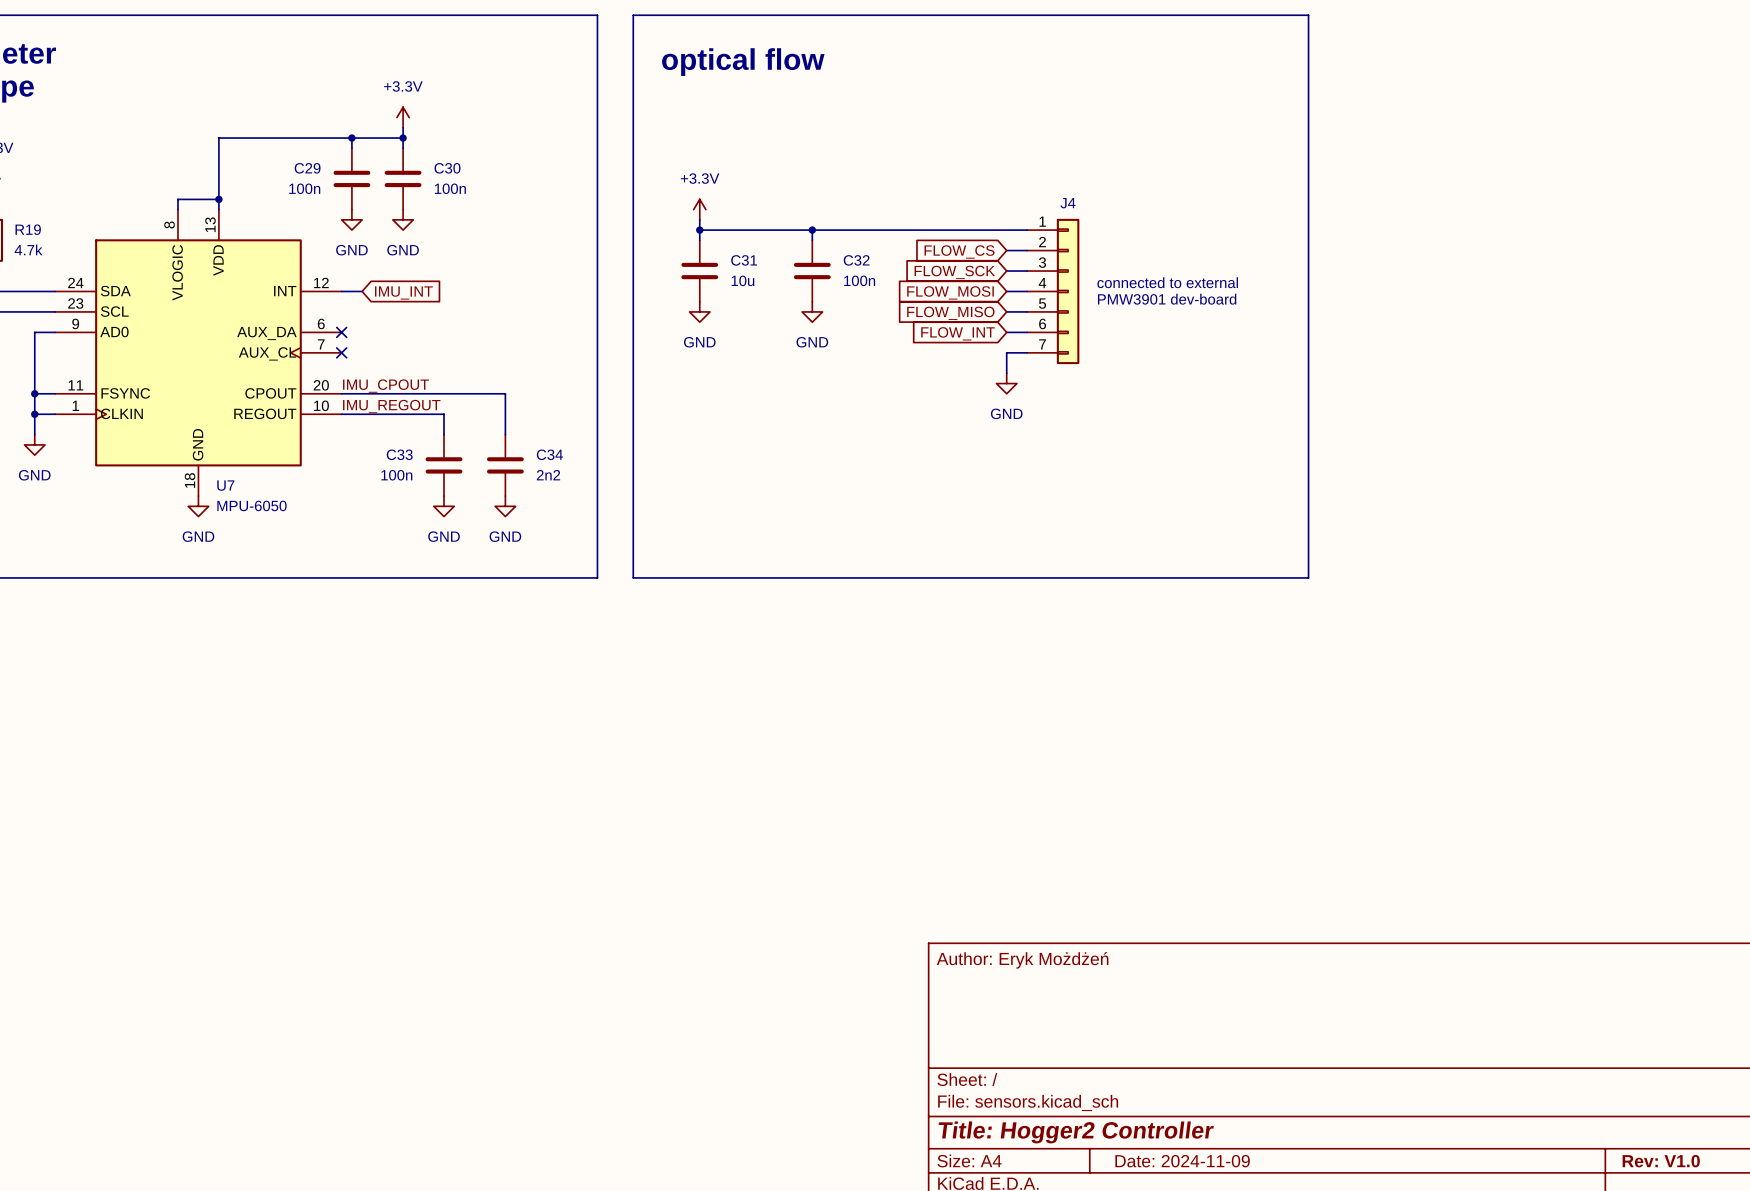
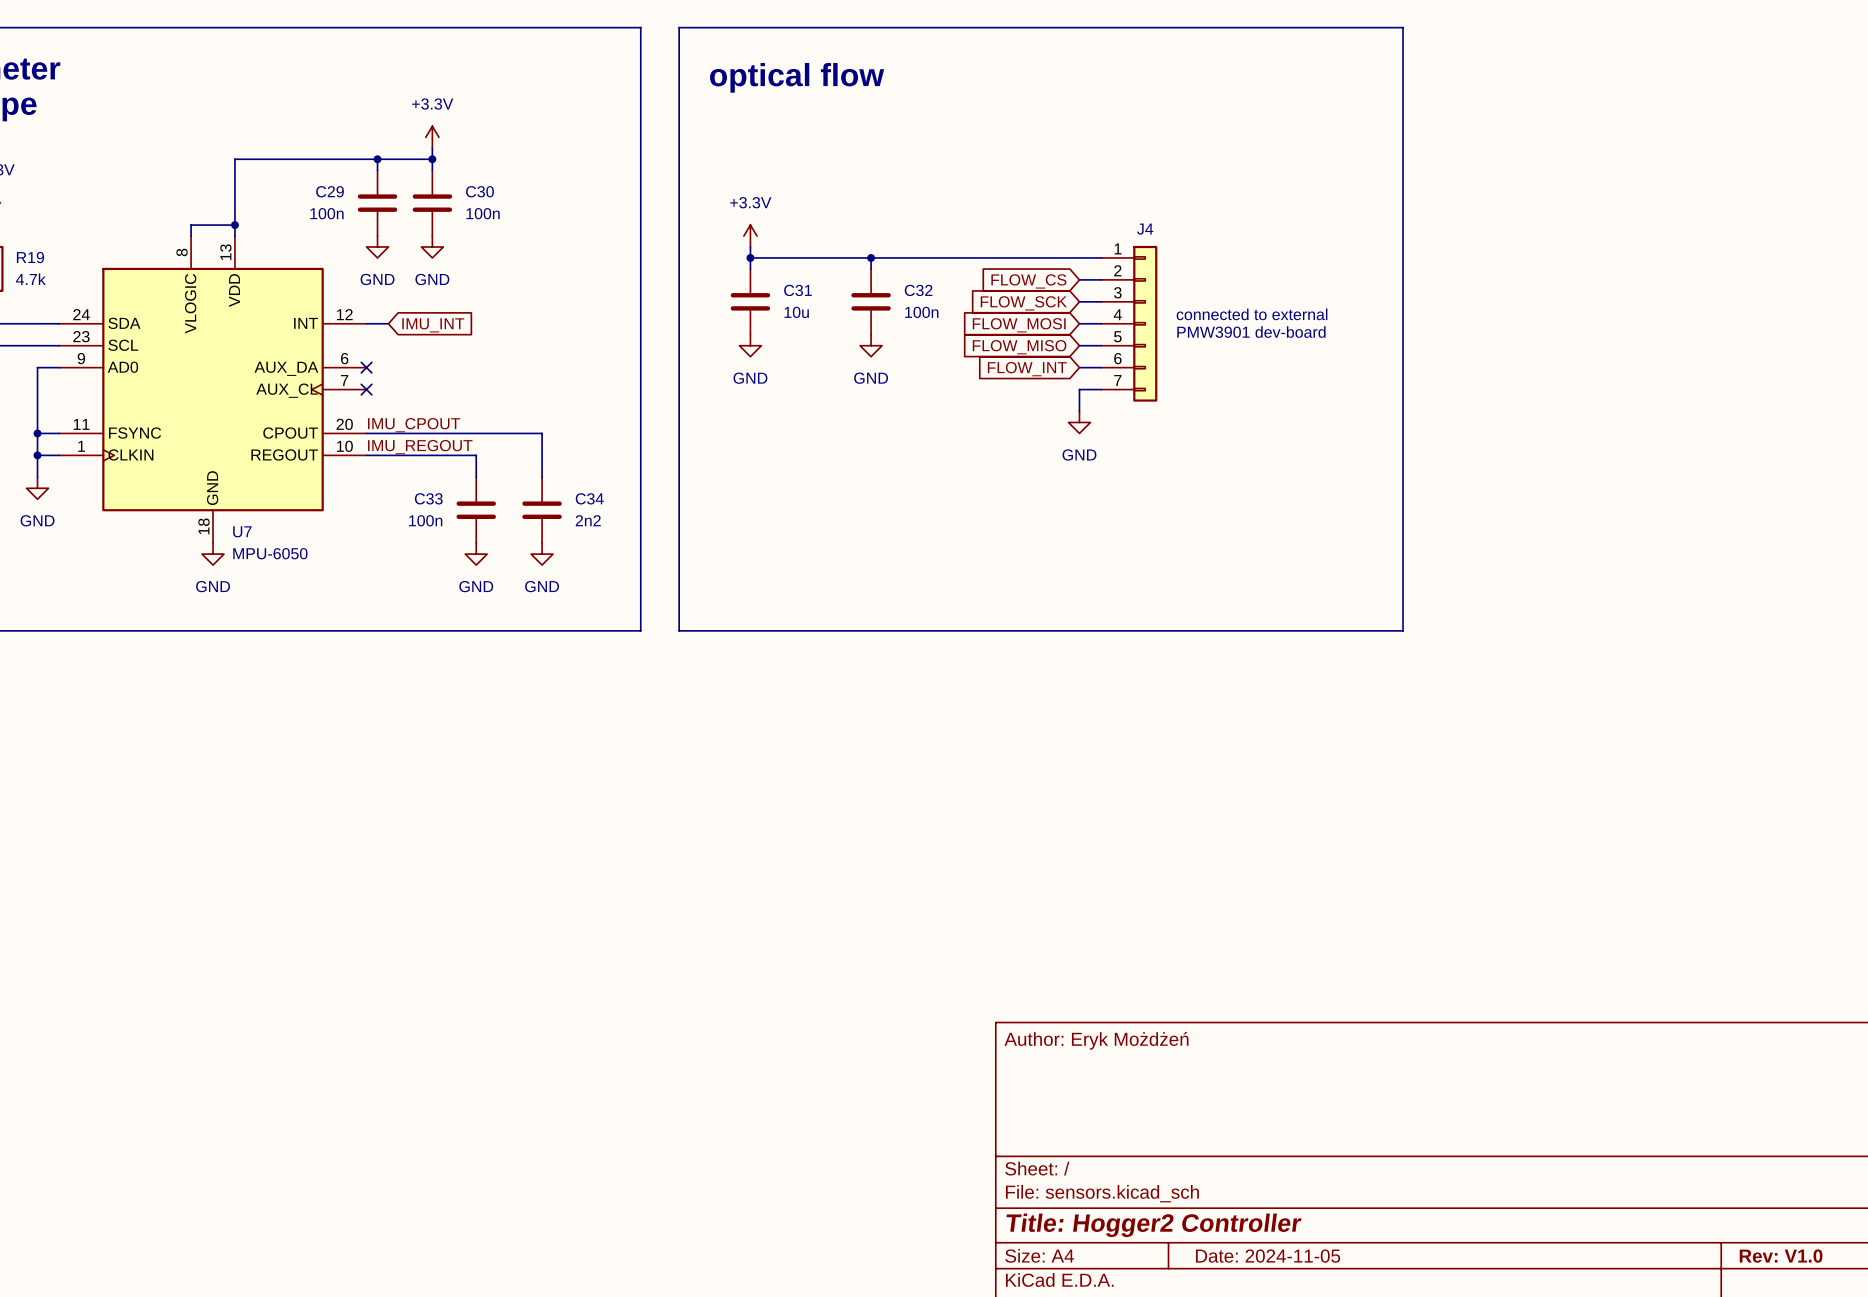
title block: Date: 2024-11-09 (1182, 1161) -> Date: 2024-11-05 (1268, 1256)

